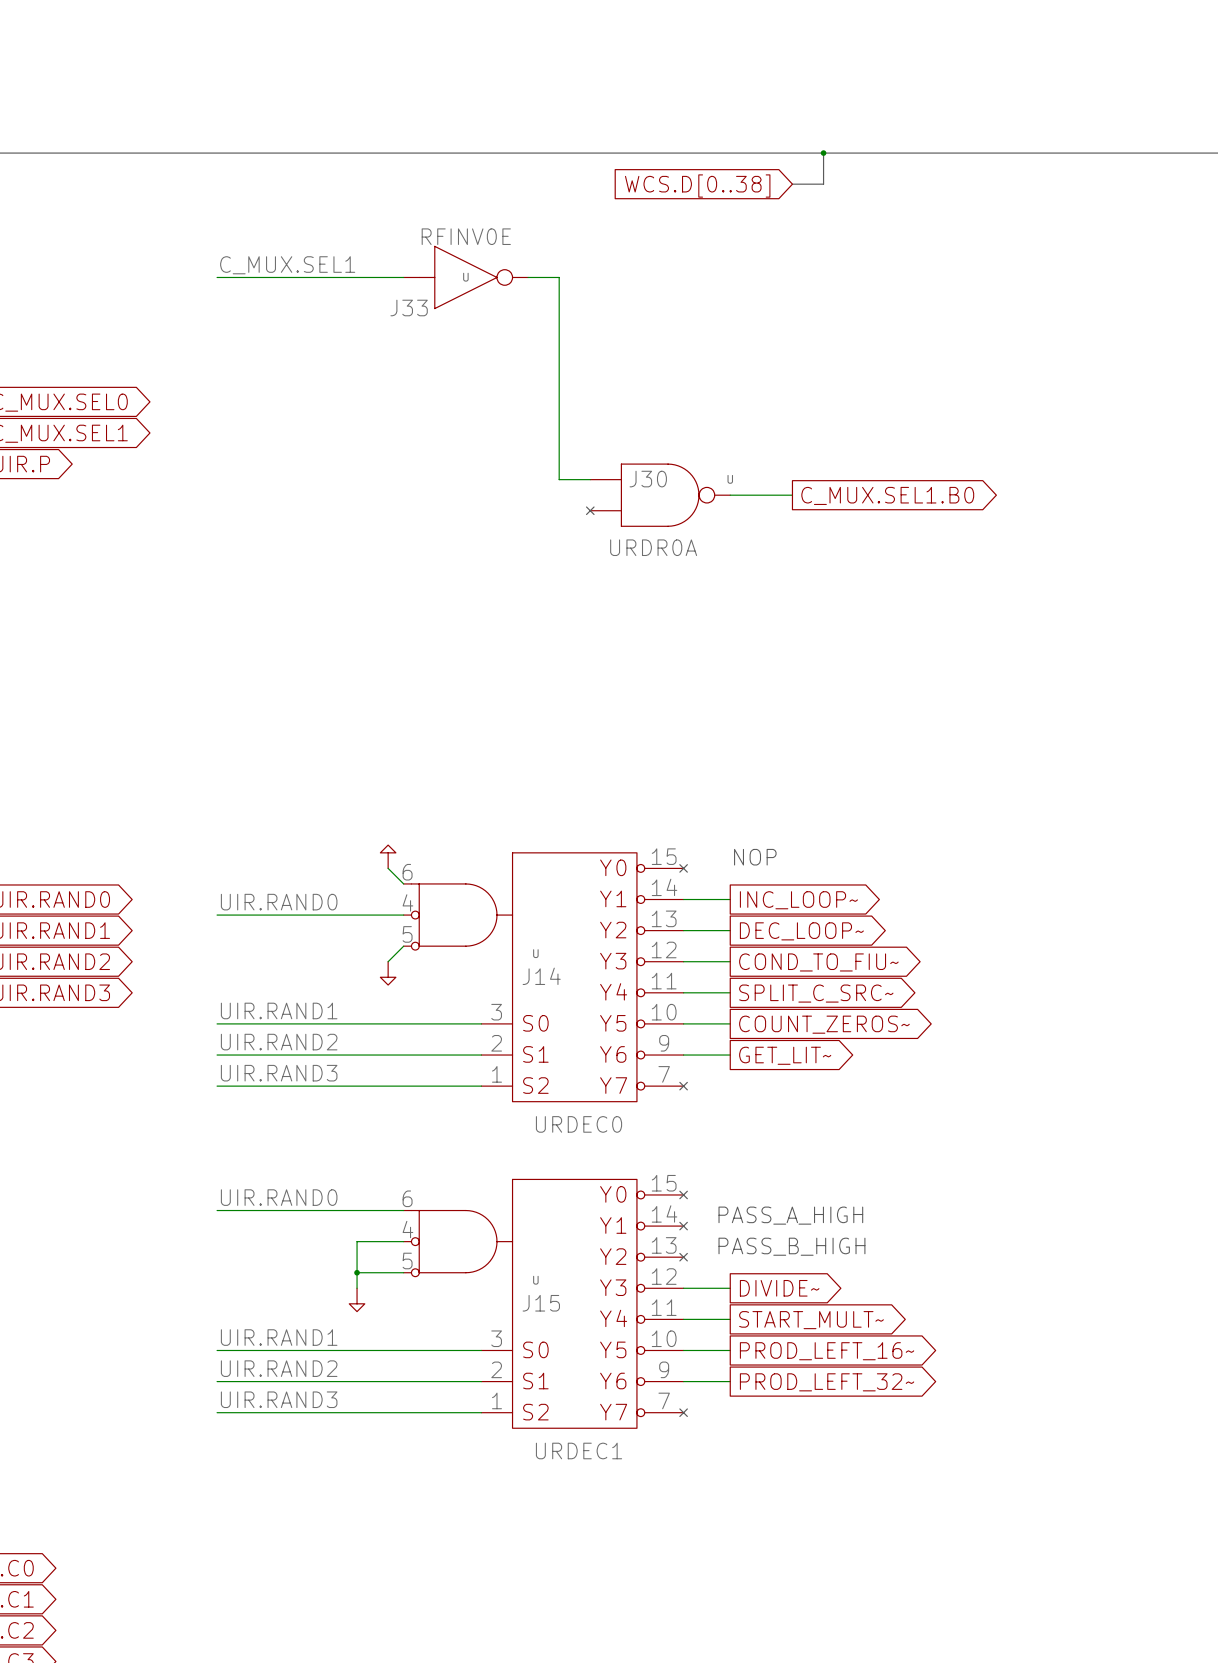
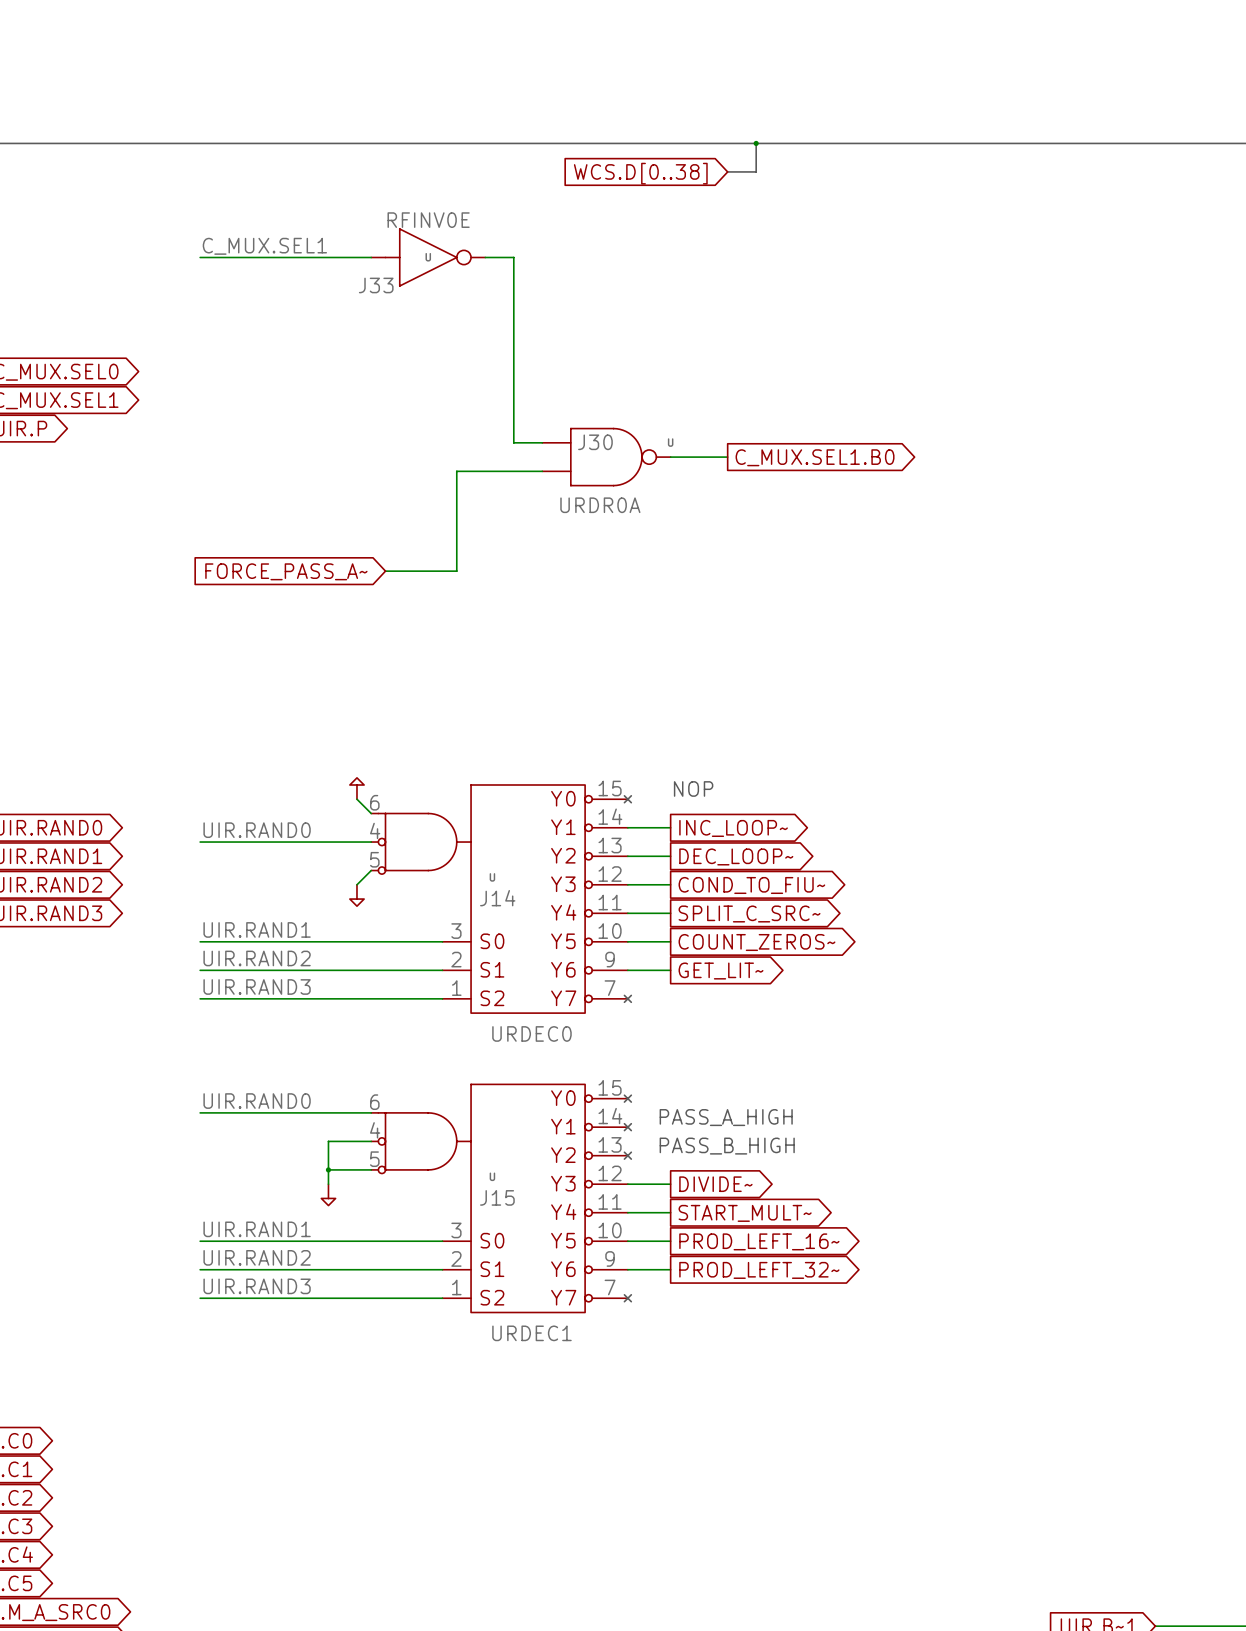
wire: none -> (542, 471) (456, 471) (456, 571) (385, 571)
no-connect mark: (590, 510) -> none
global label: none -> FORCE_PASS_A~ (286, 571)

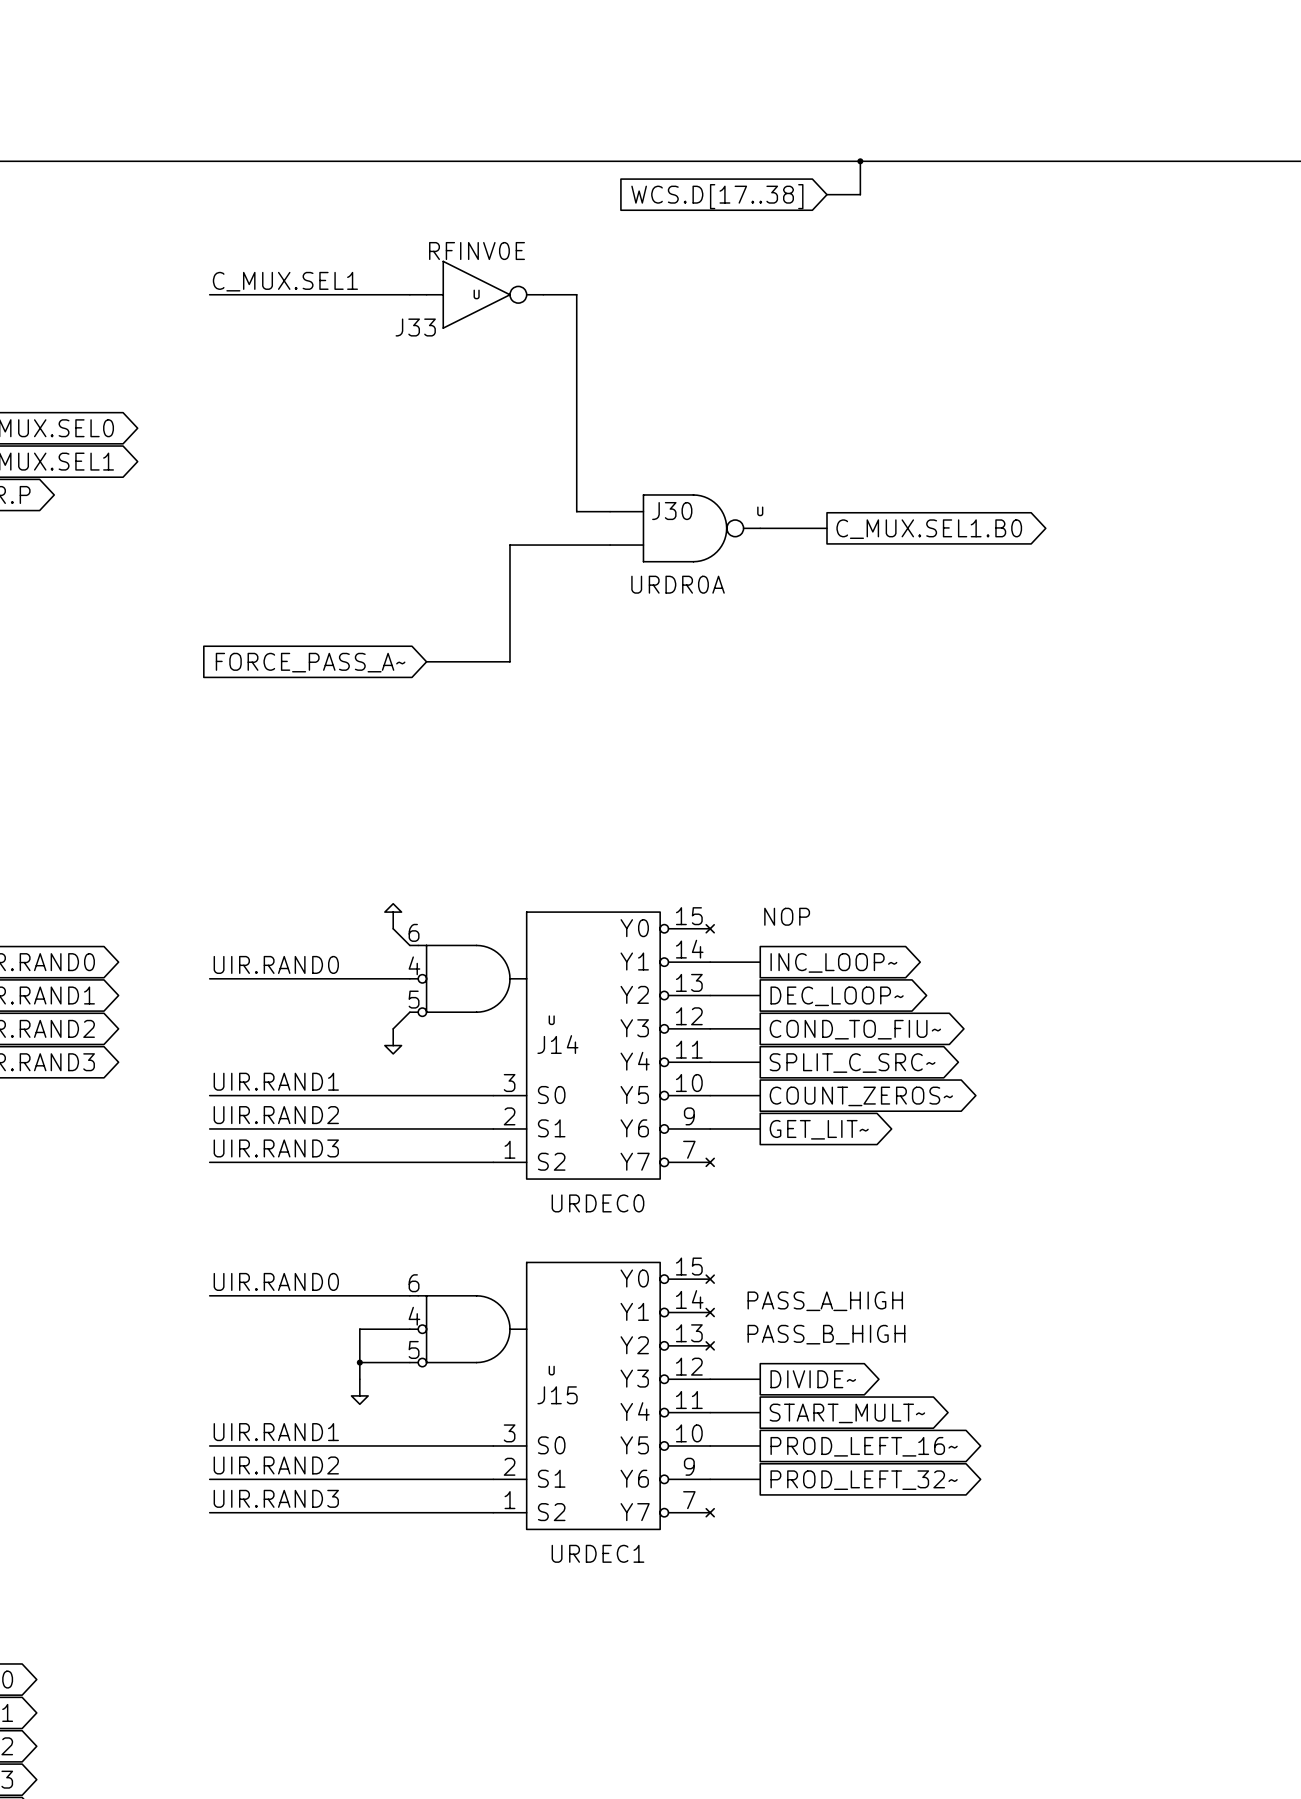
global label: WCS.D[0..38] (640, 173) -> WCS.D[17..38] (717, 196)

